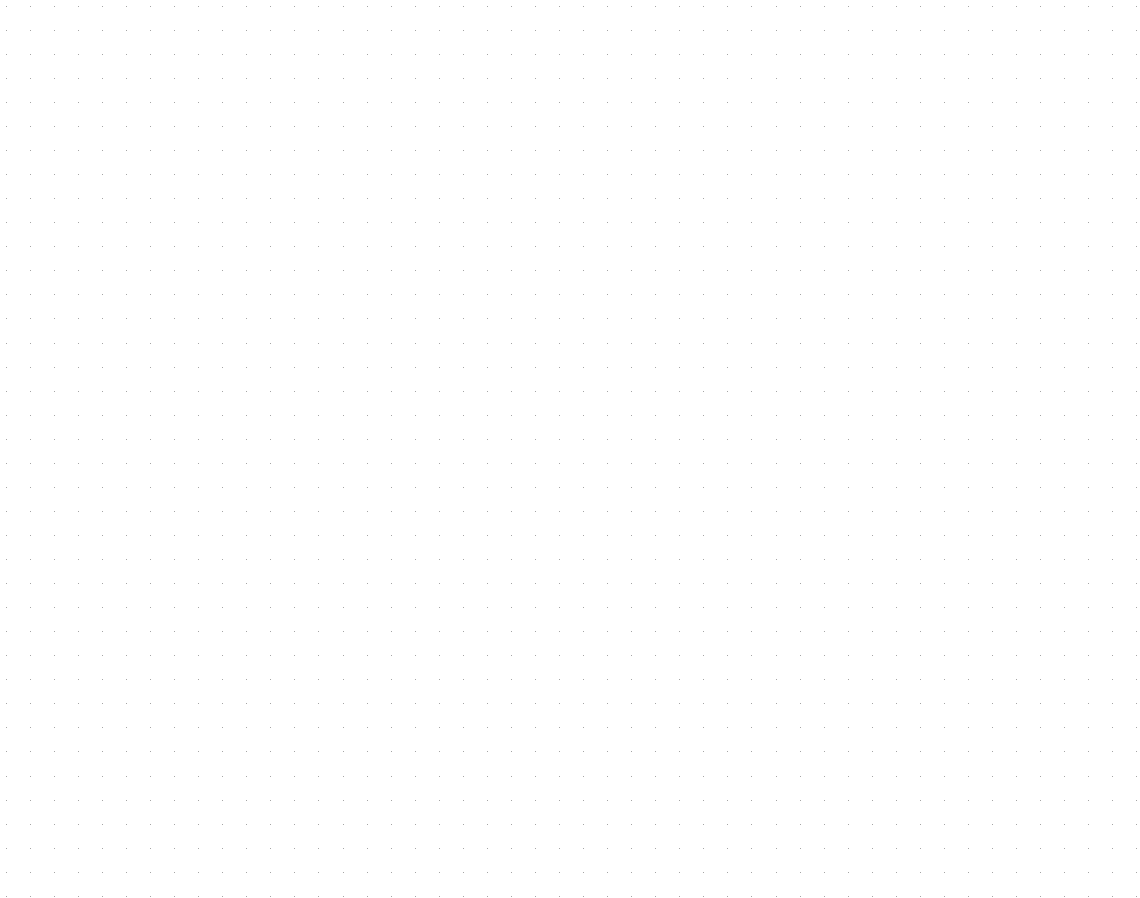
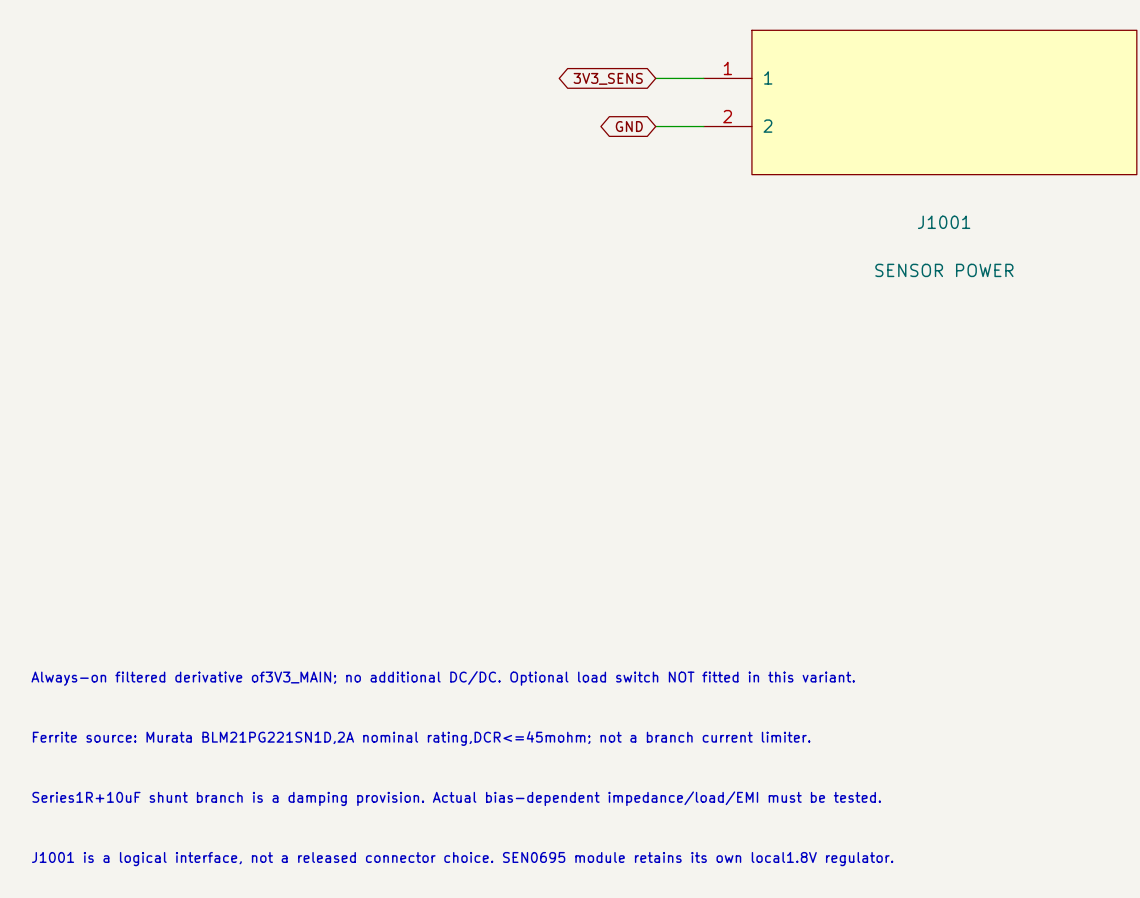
global label: none -> 3V3_SENS (608, 78)
wire: none -> (655, 78) (703, 78)
J1001: none -> SENSOR POWER (920, 102)
global label: none -> GND (629, 126)
wire: none -> (655, 126) (703, 126)
text: none -> Always-on filtered derivative of3V3_MAIN; no additional DC/DC. Optional load switch NOT fitted in this variant. (443, 678)
text: none -> Ferrite source: Murata BLM21PG221SN1D,2A nominal rating,DCR<=45mohm; not a branch current limiter. (421, 738)
text: none -> Series1R+10uF shunt branch is a damping provision. Actual bias-dependent impedance/load/EMI must be tested. (456, 798)
text: none -> J1001 is a logical interface, not a released connector choice. SEN0695 module retains its own local1.8V regulator. (462, 859)

